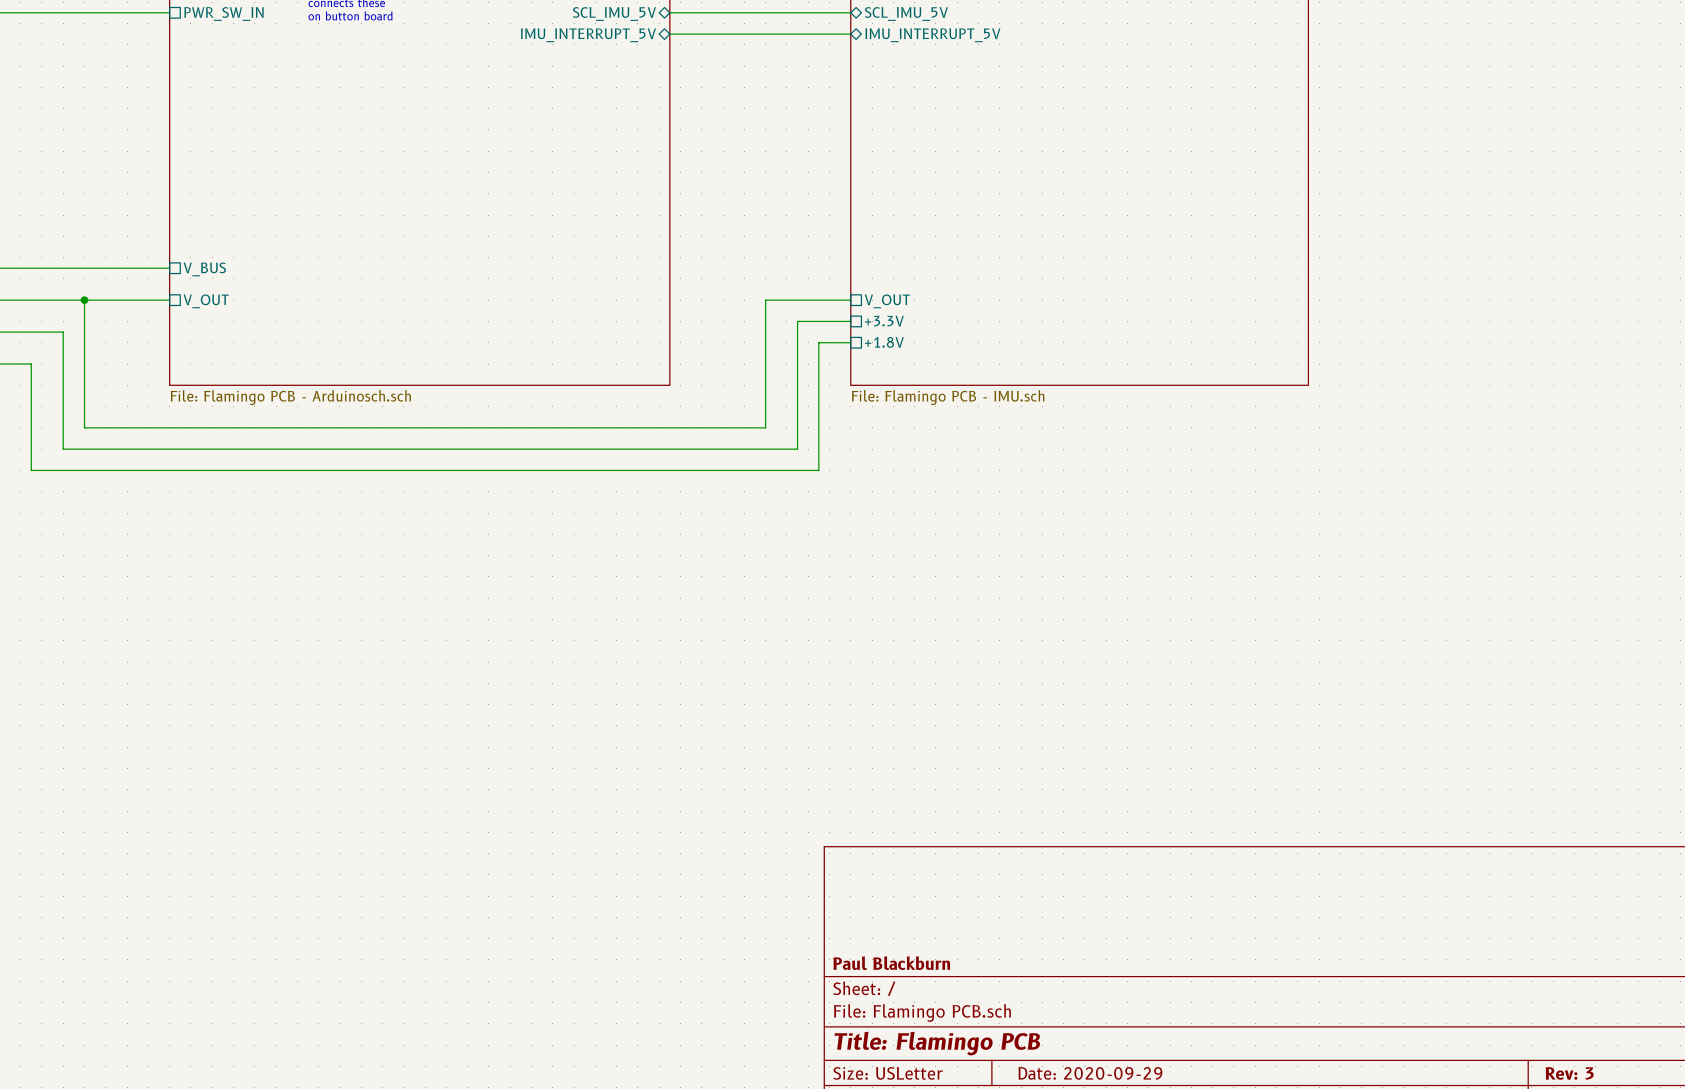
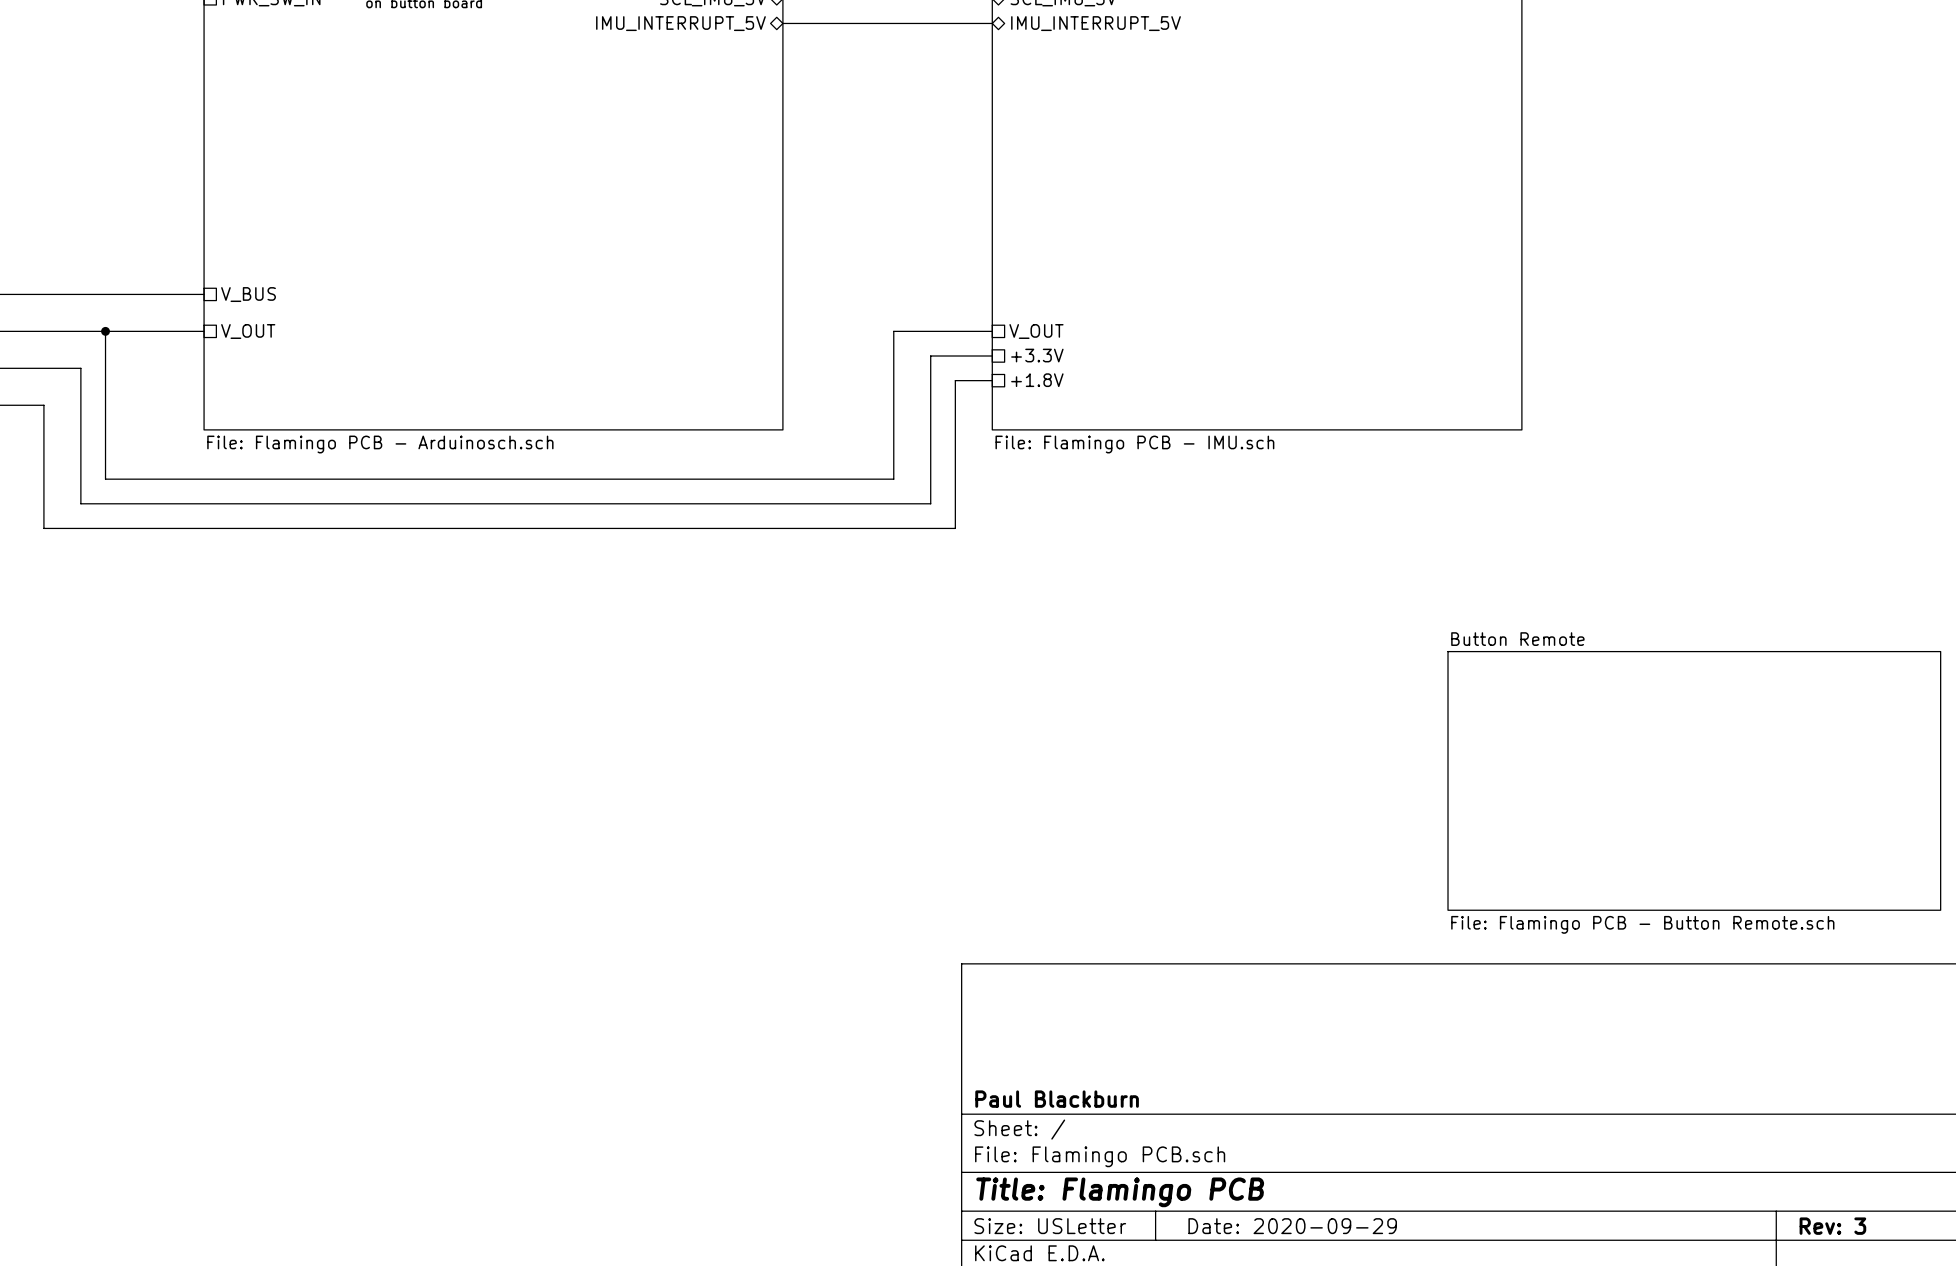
sheet Button Remote: none -> File: Flamingo PCB - Button Remote.sch (1694, 780)

